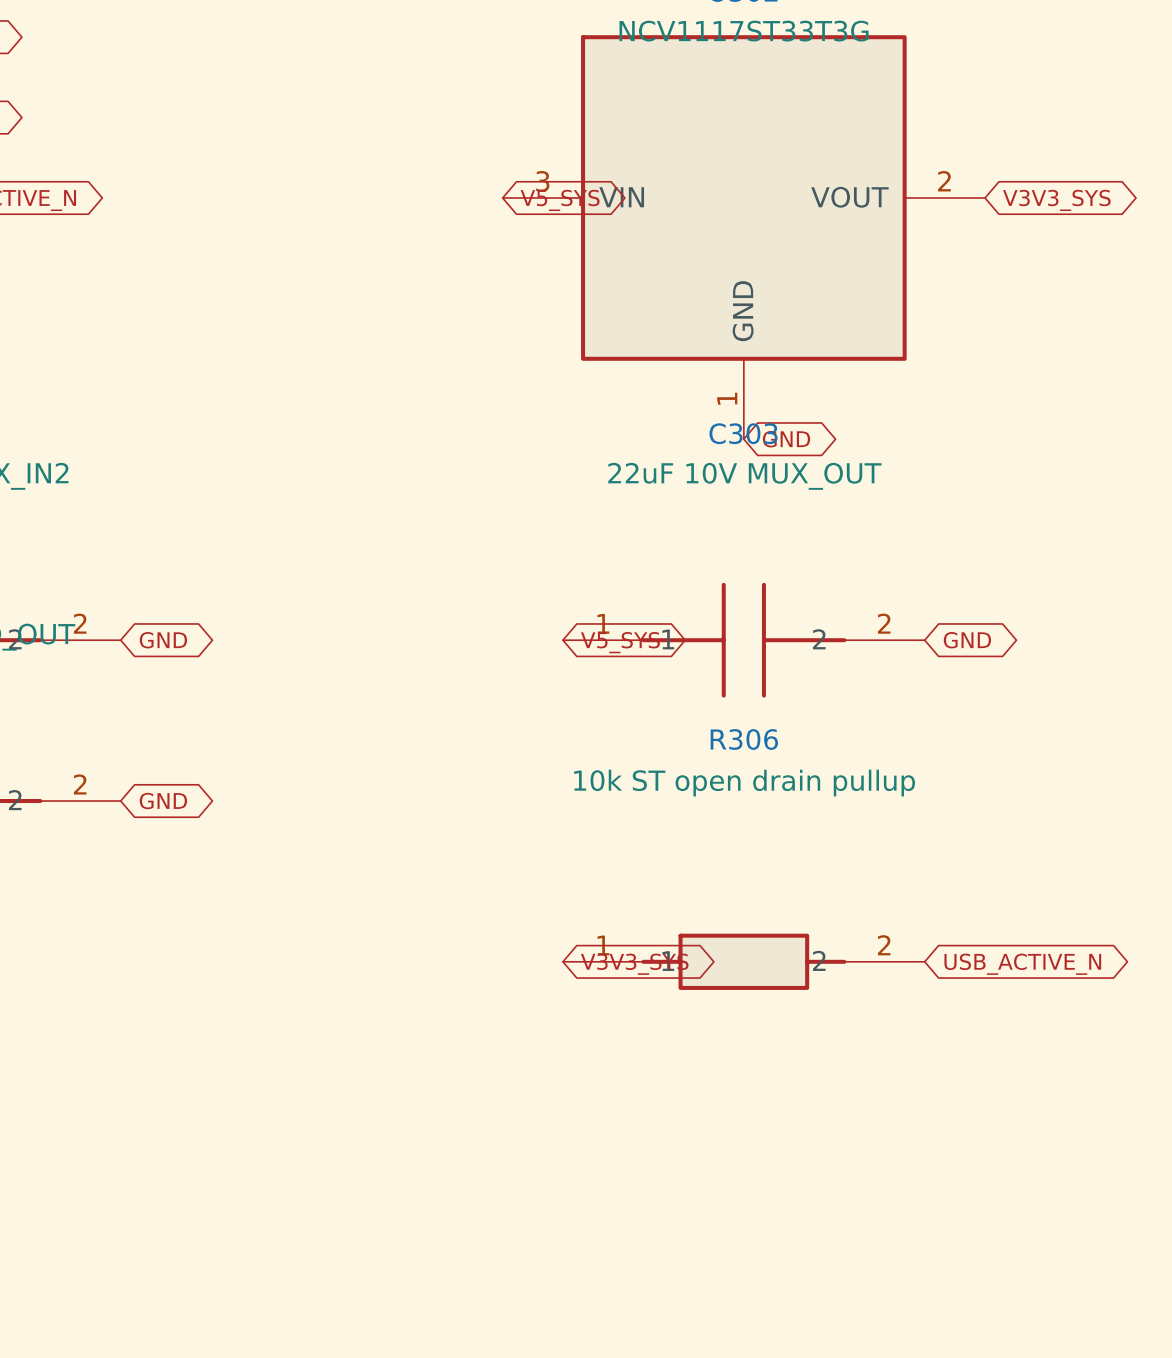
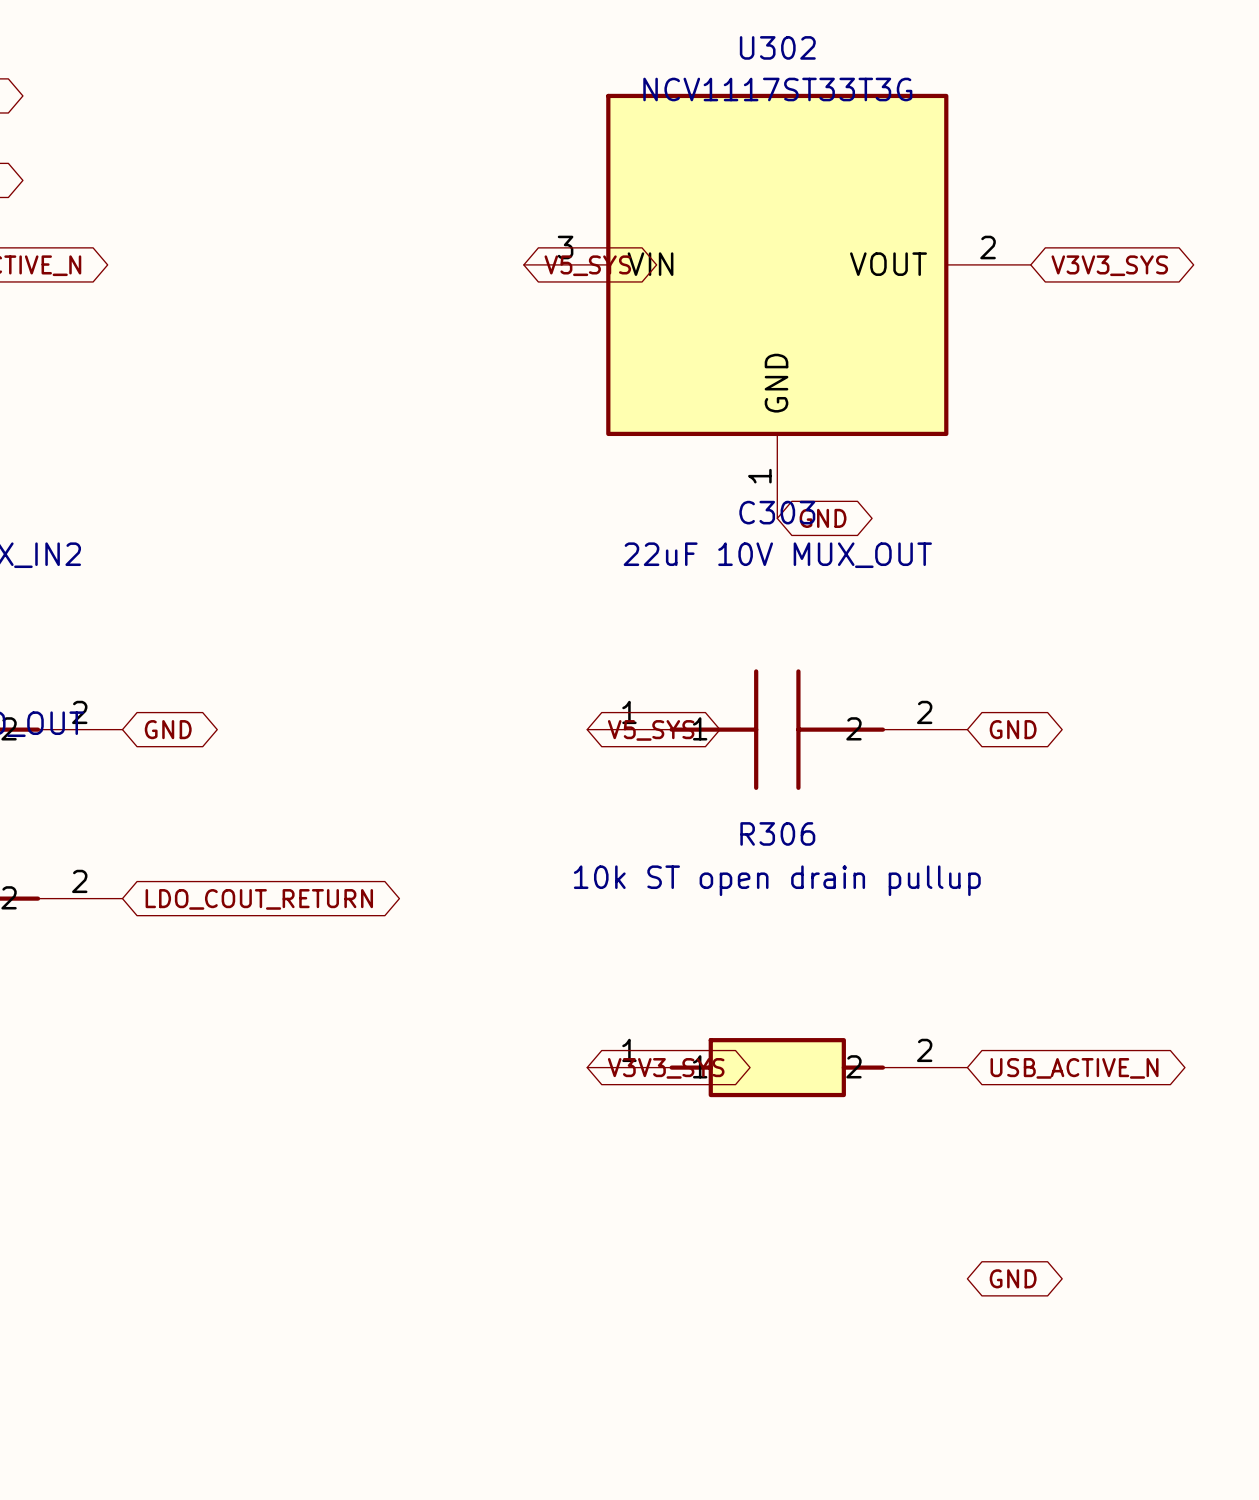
global label: GND (163, 801) -> LDO_COUT_RETURN (259, 899)
global label: none -> GND (1013, 1278)

